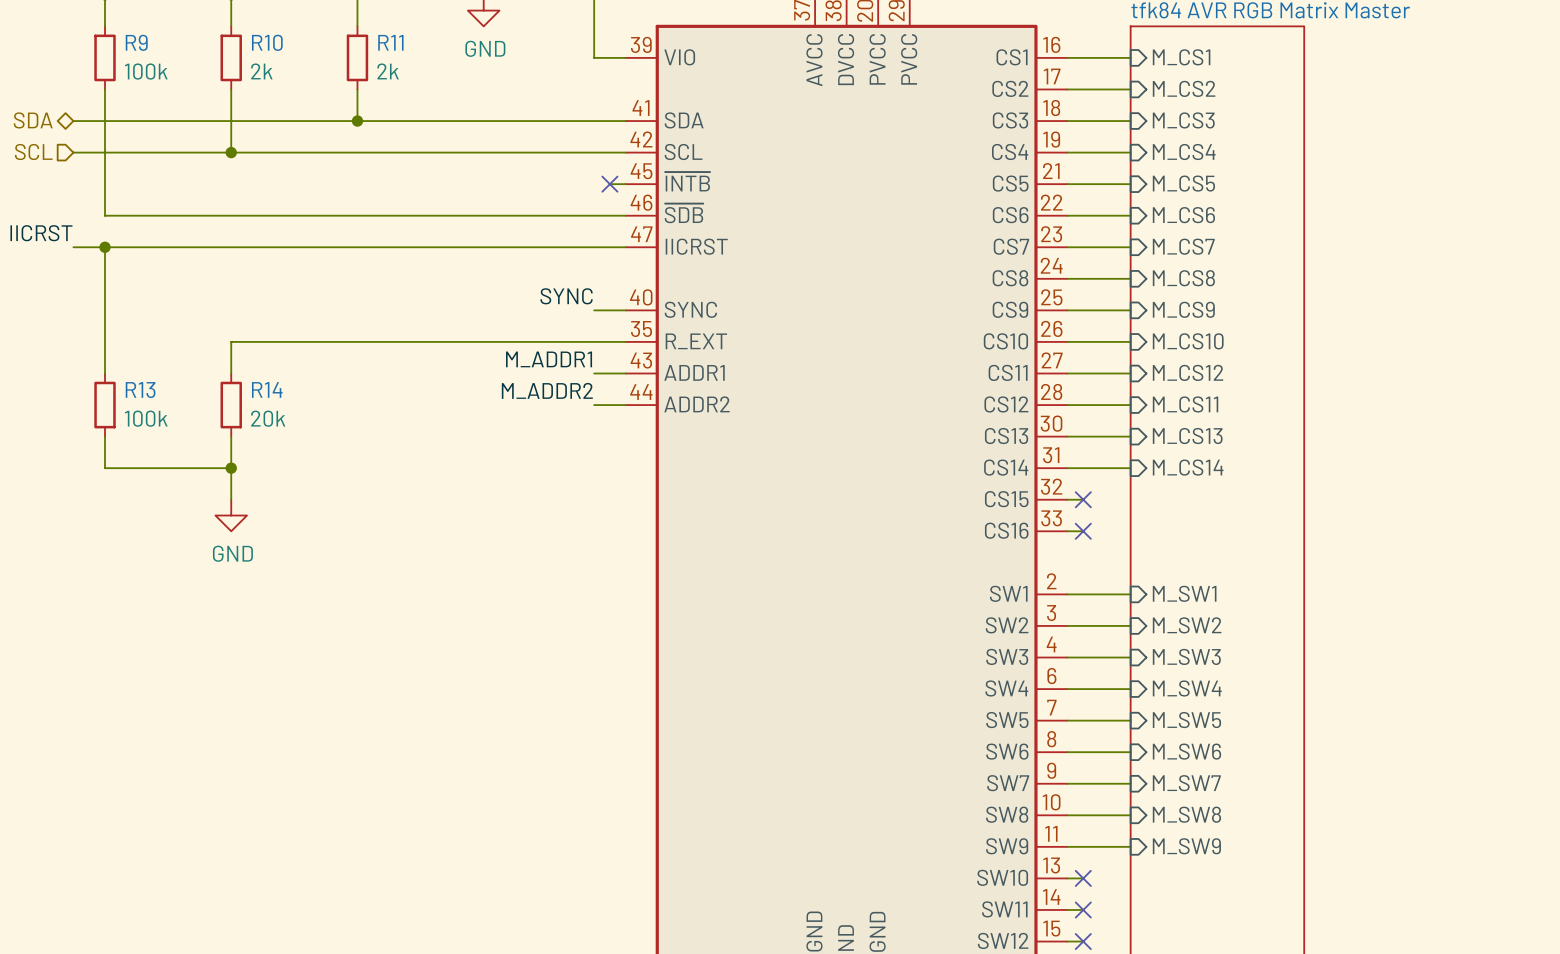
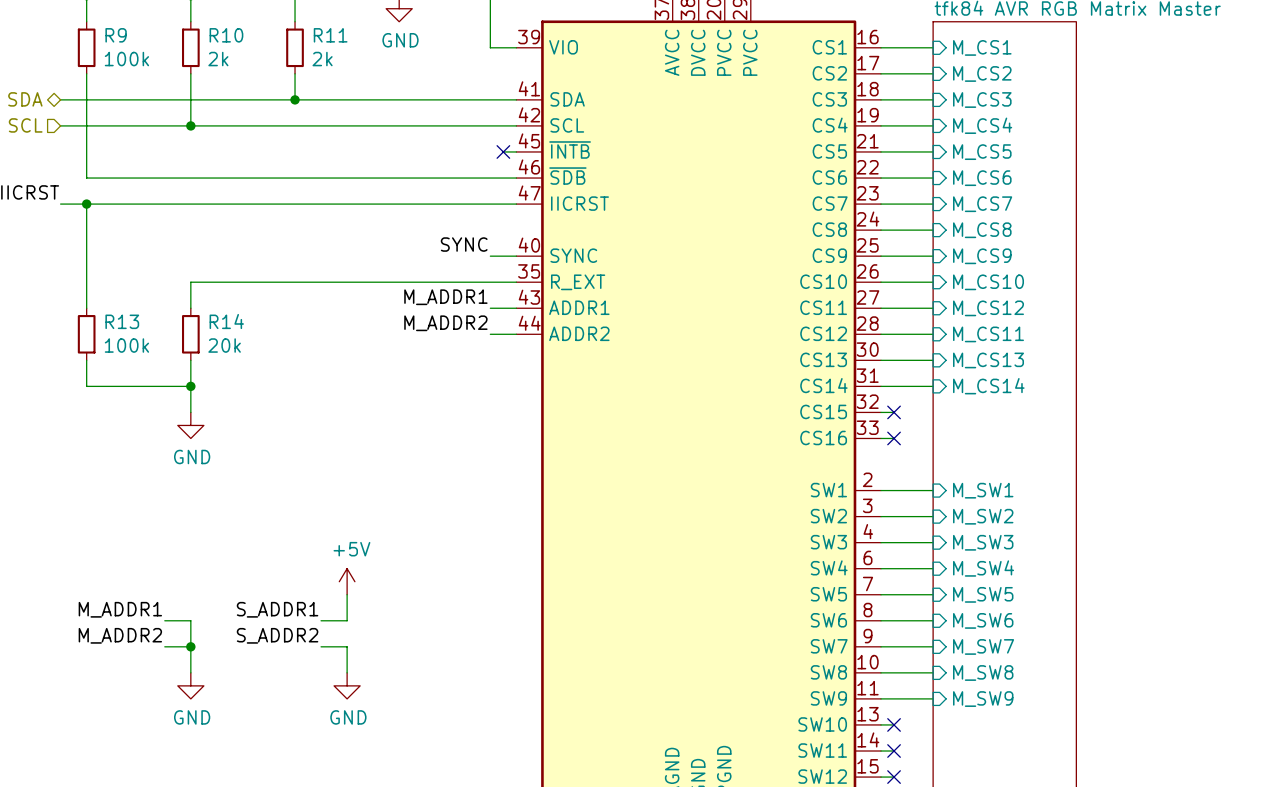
power symbol: none -> +5V (347, 581)
wire: none -> (347, 594) (347, 620) (321, 620)
label: none -> M_ADDR1 (120, 609)
label: none -> S_ADDR1 (277, 609)
wire: none -> (164, 620) (190, 620) (190, 672)
label: none -> M_ADDR2 (120, 635)
label: none -> S_ADDR2 (277, 635)
wire: none -> (164, 646) (190, 646)
junction: none -> (190, 646)
wire: none -> (321, 646) (347, 646) (347, 672)
power symbol: none -> GND (190, 685)
power symbol: none -> GND (347, 685)

